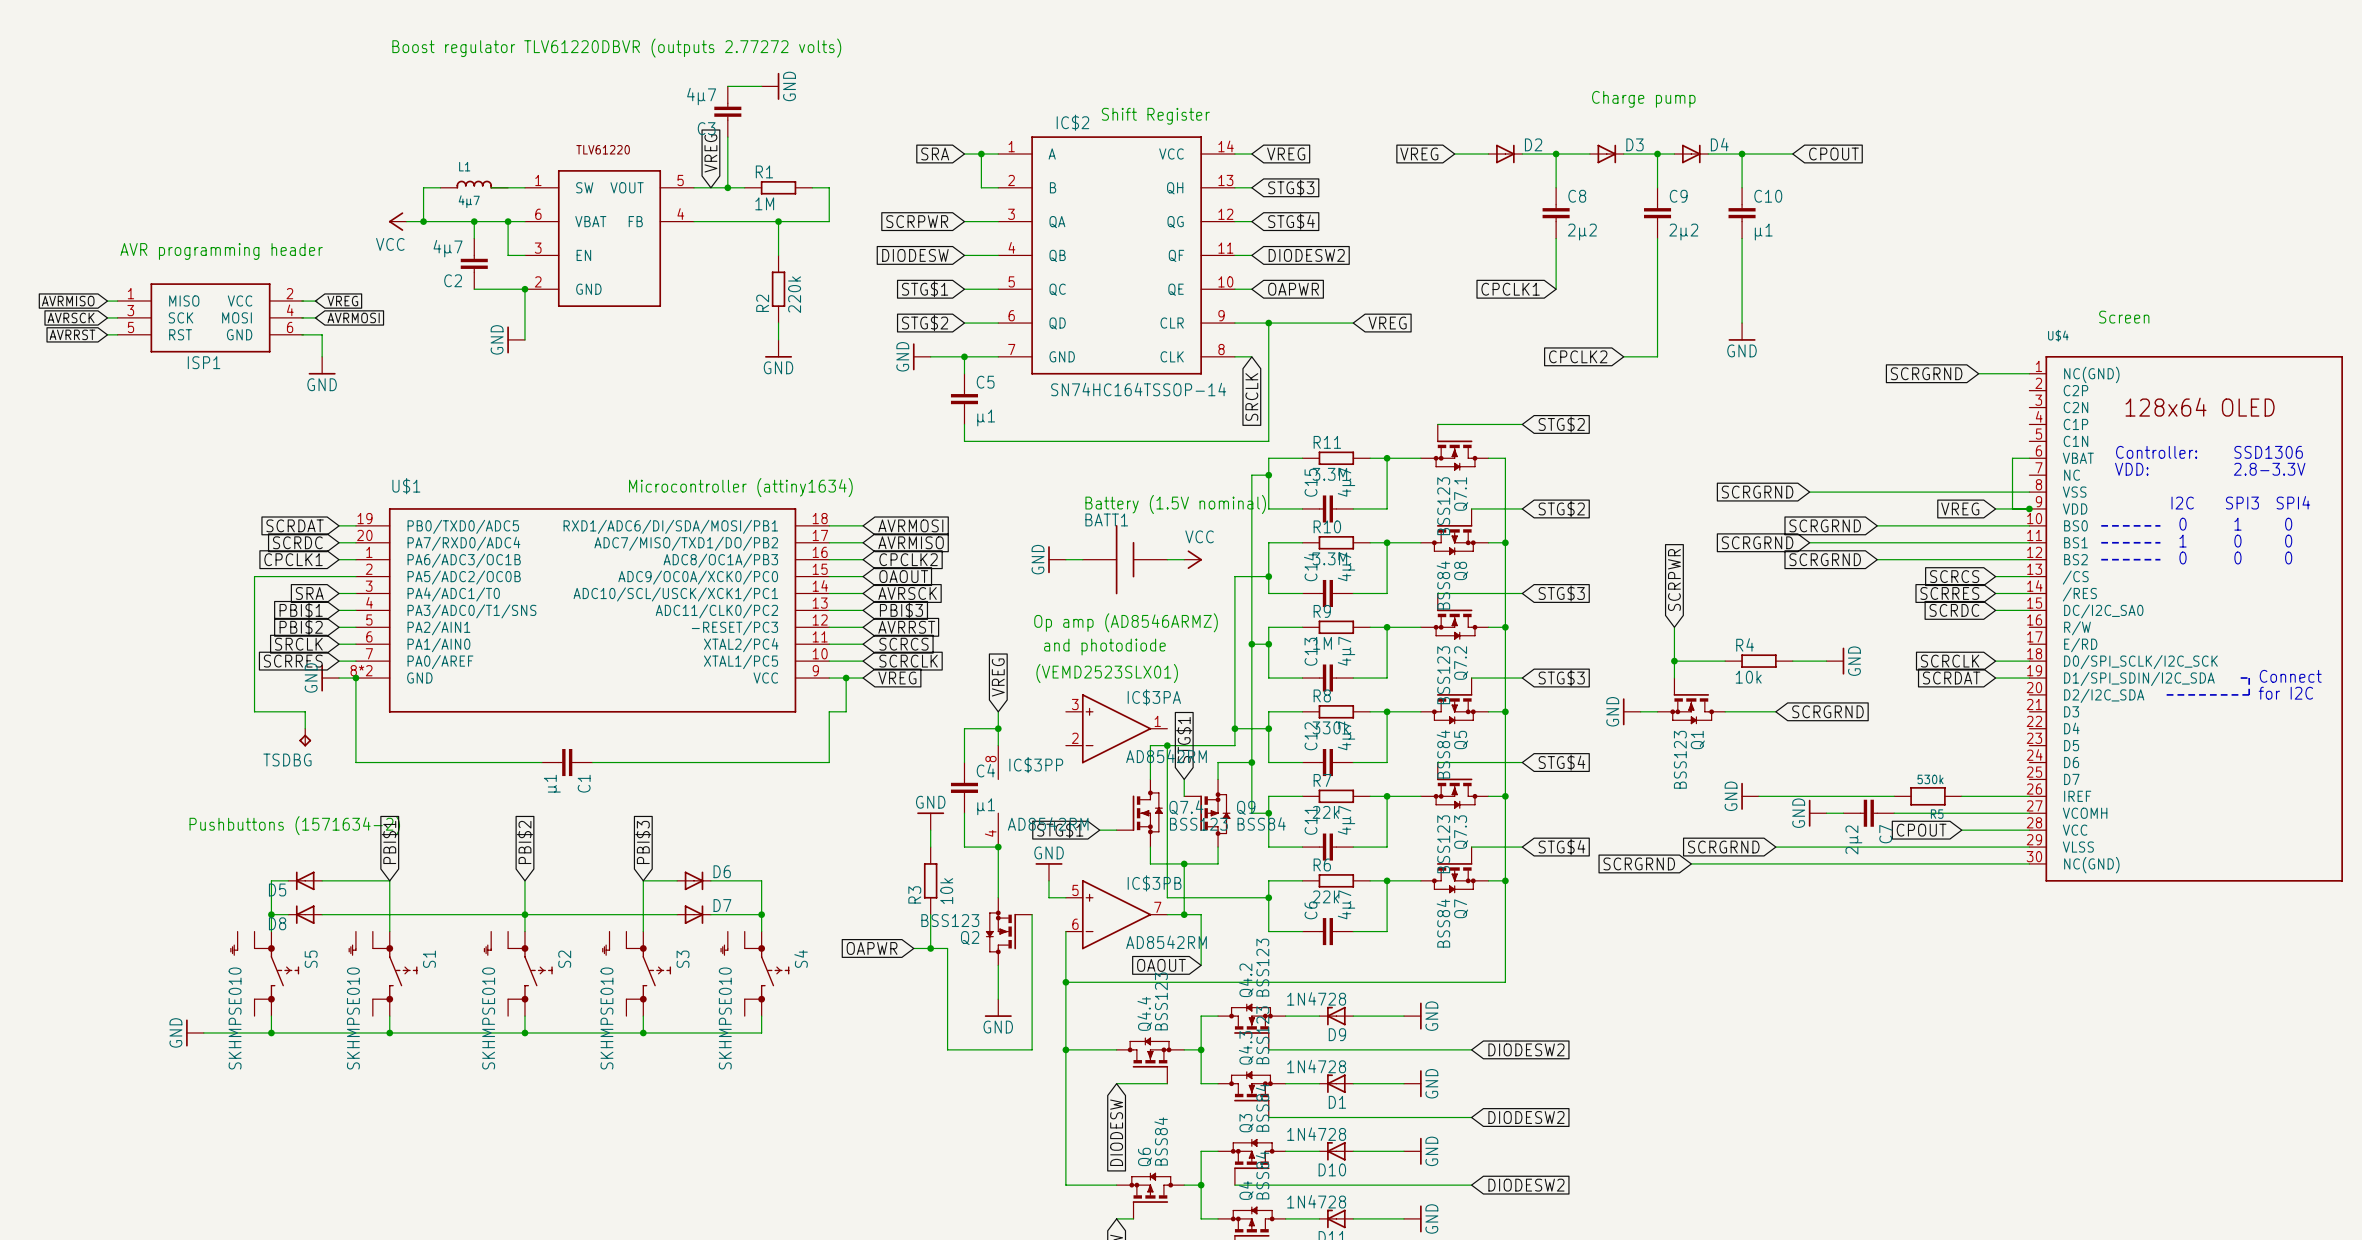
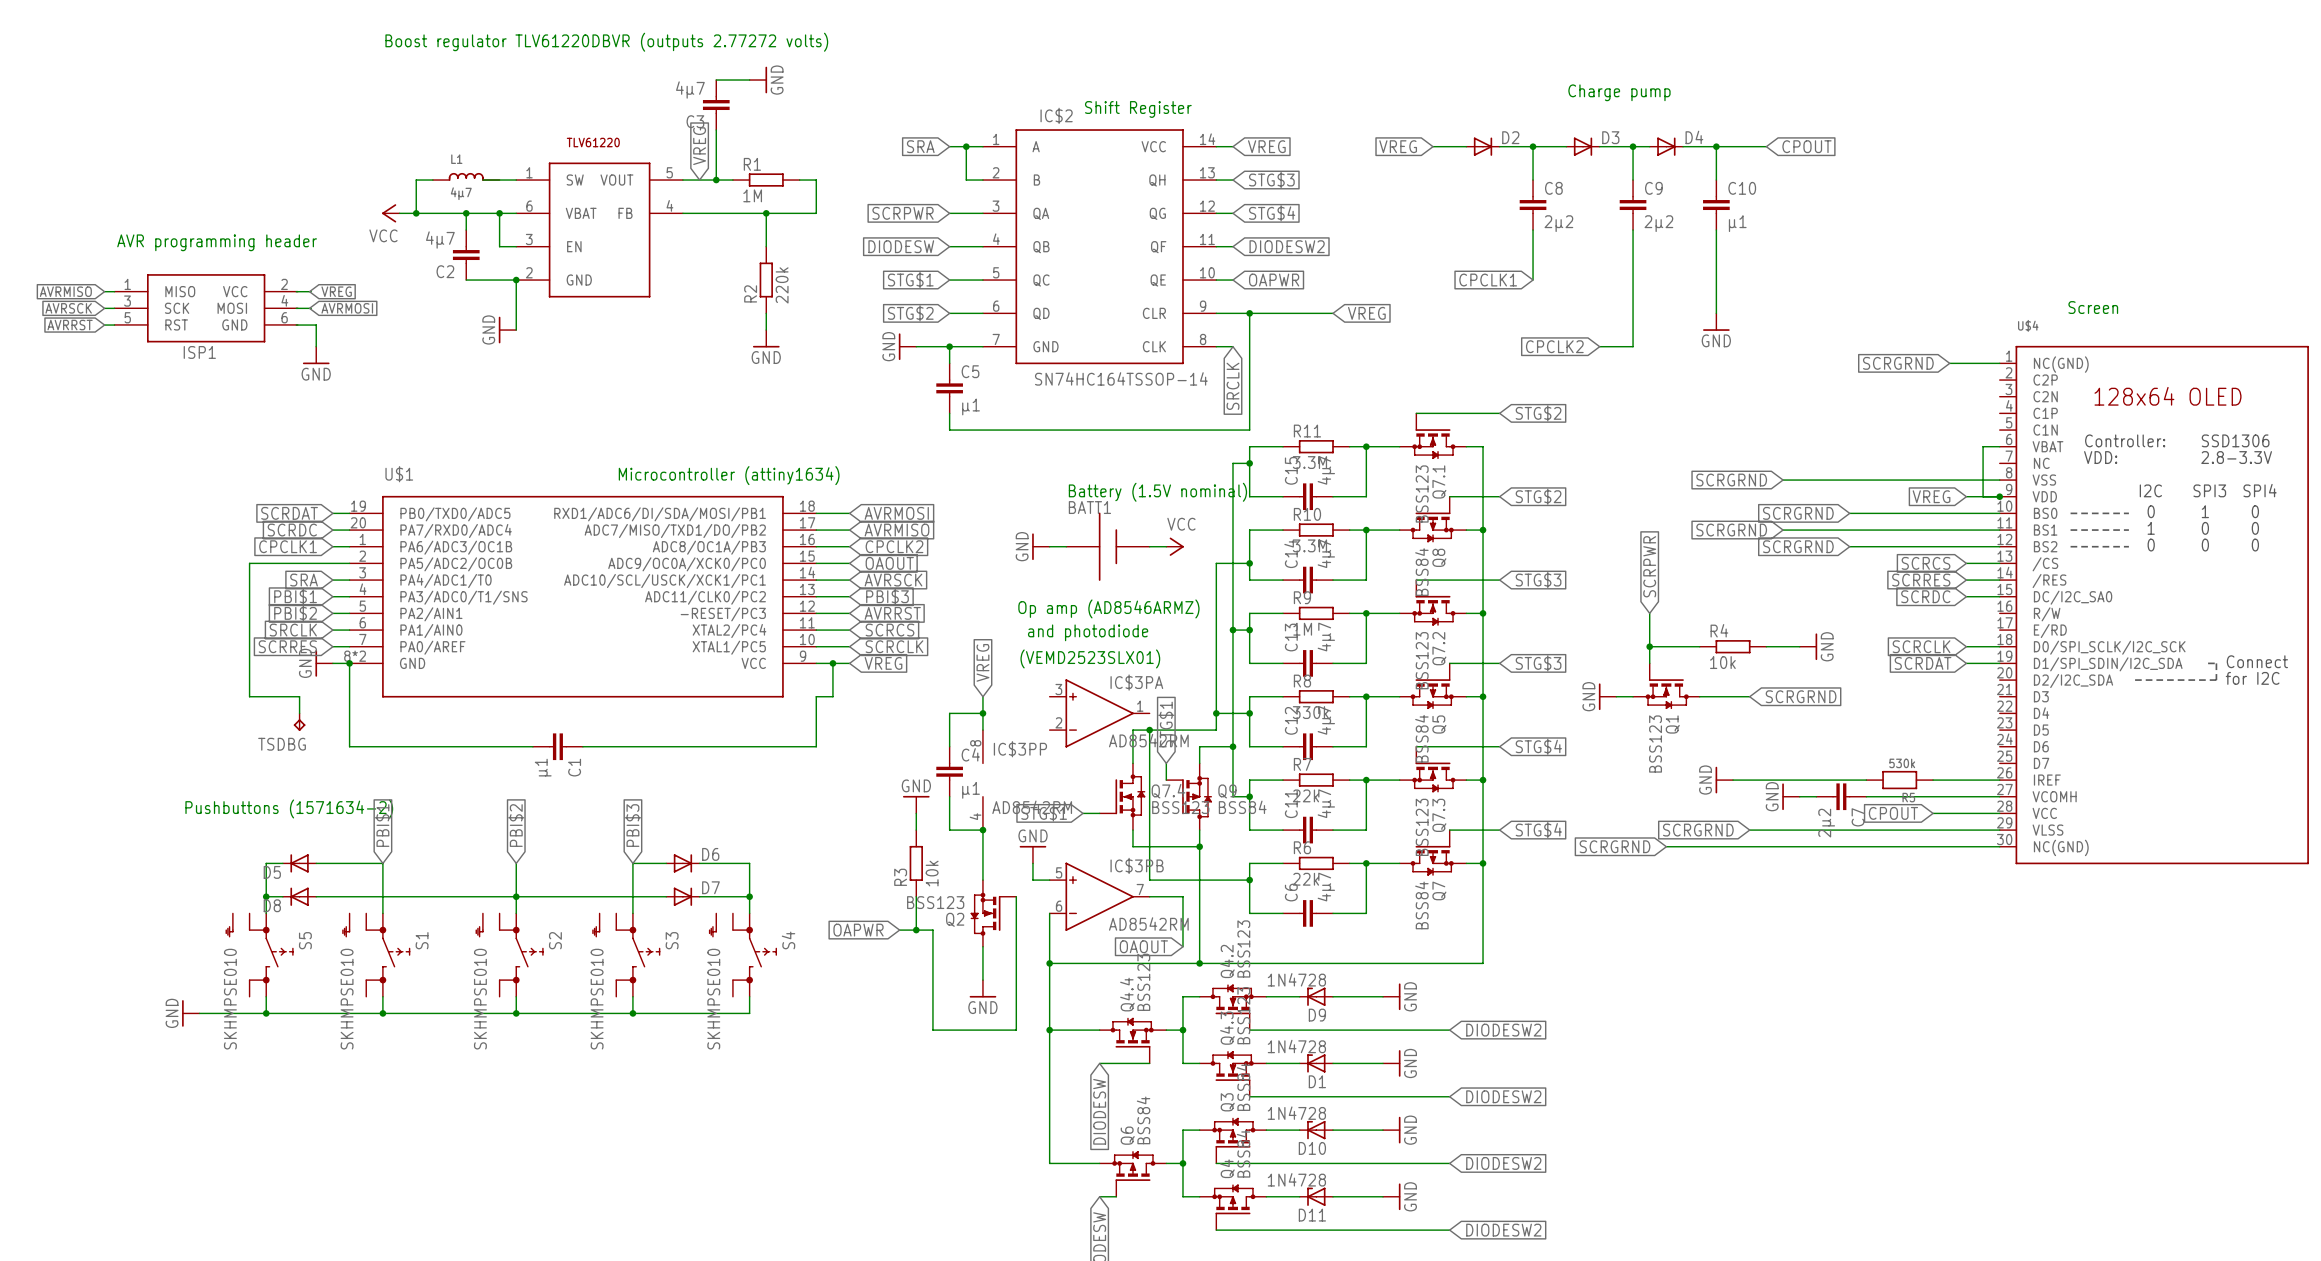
wire: (1184, 863) (1184, 914) -> none
junction: (1184, 863) -> none
wire: none -> (1199, 846) (1199, 963)
junction: none -> (1199, 846)
junction: (1184, 914) -> none
junction: none -> (1199, 963)

